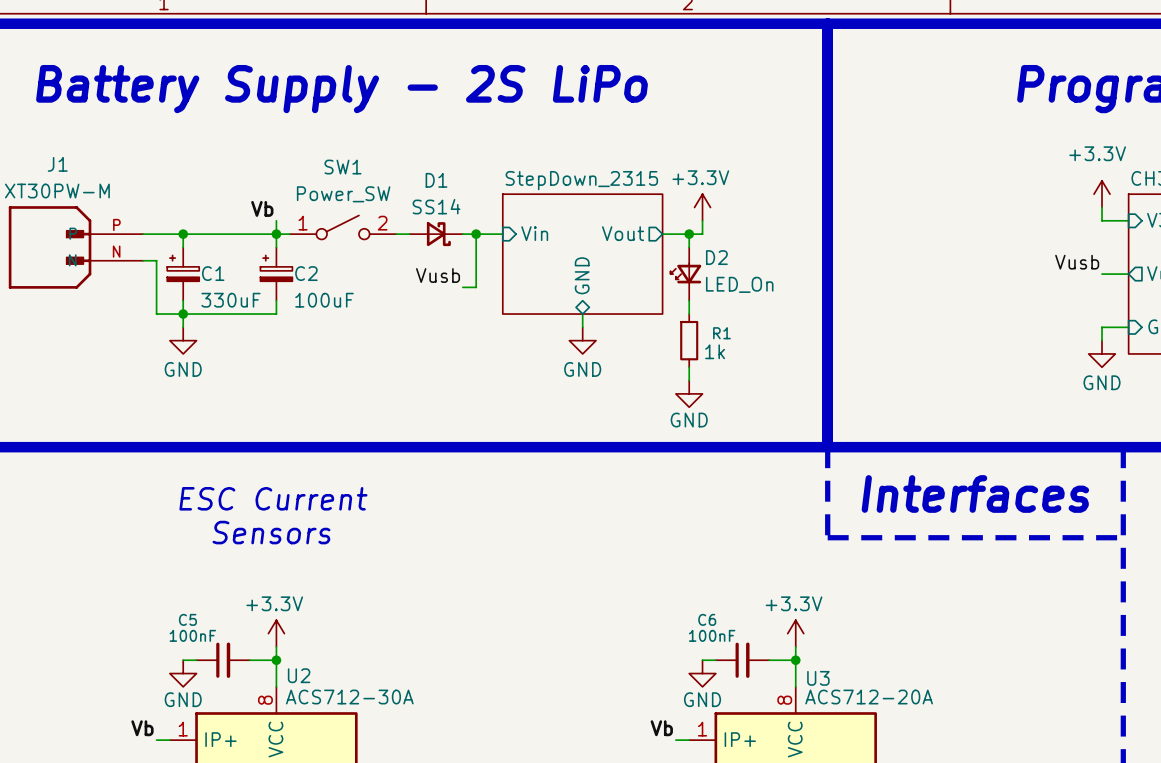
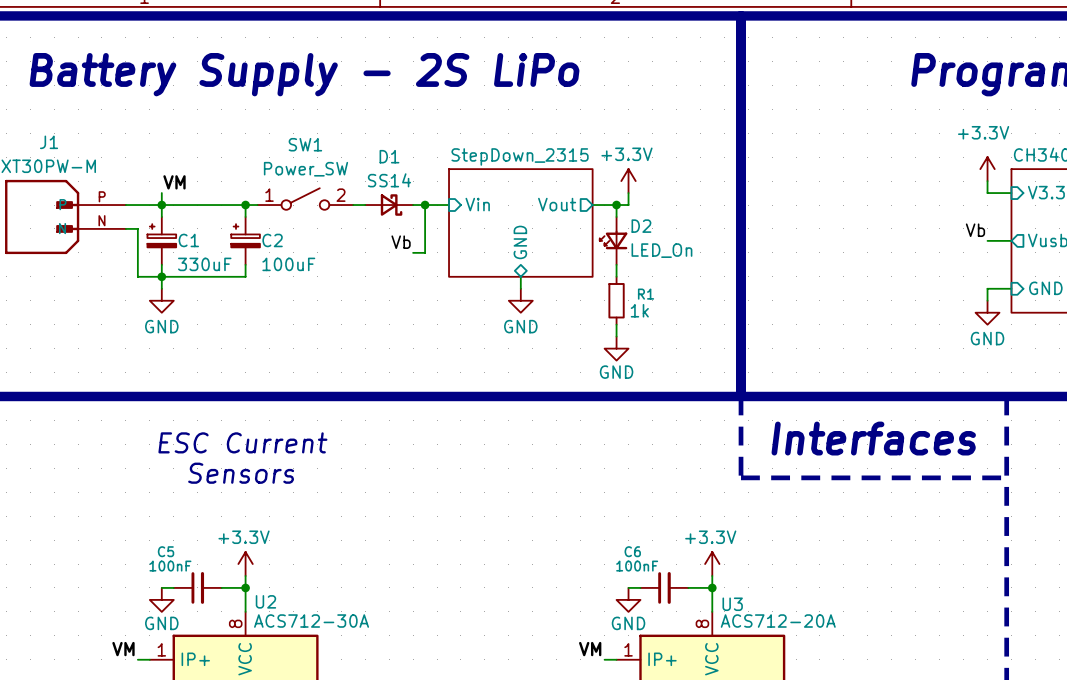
label: none -> VM (174, 182)
label: Vb (262, 208) -> none
wire: (276, 220) (276, 234) -> (161, 193) (161, 205)
label: Vusb (1077, 262) -> Vb (975, 230)
label: Vusb (438, 275) -> Vb (401, 242)
label: Vb (142, 728) -> VM (123, 649)
label: Vb (661, 728) -> VM (590, 649)

